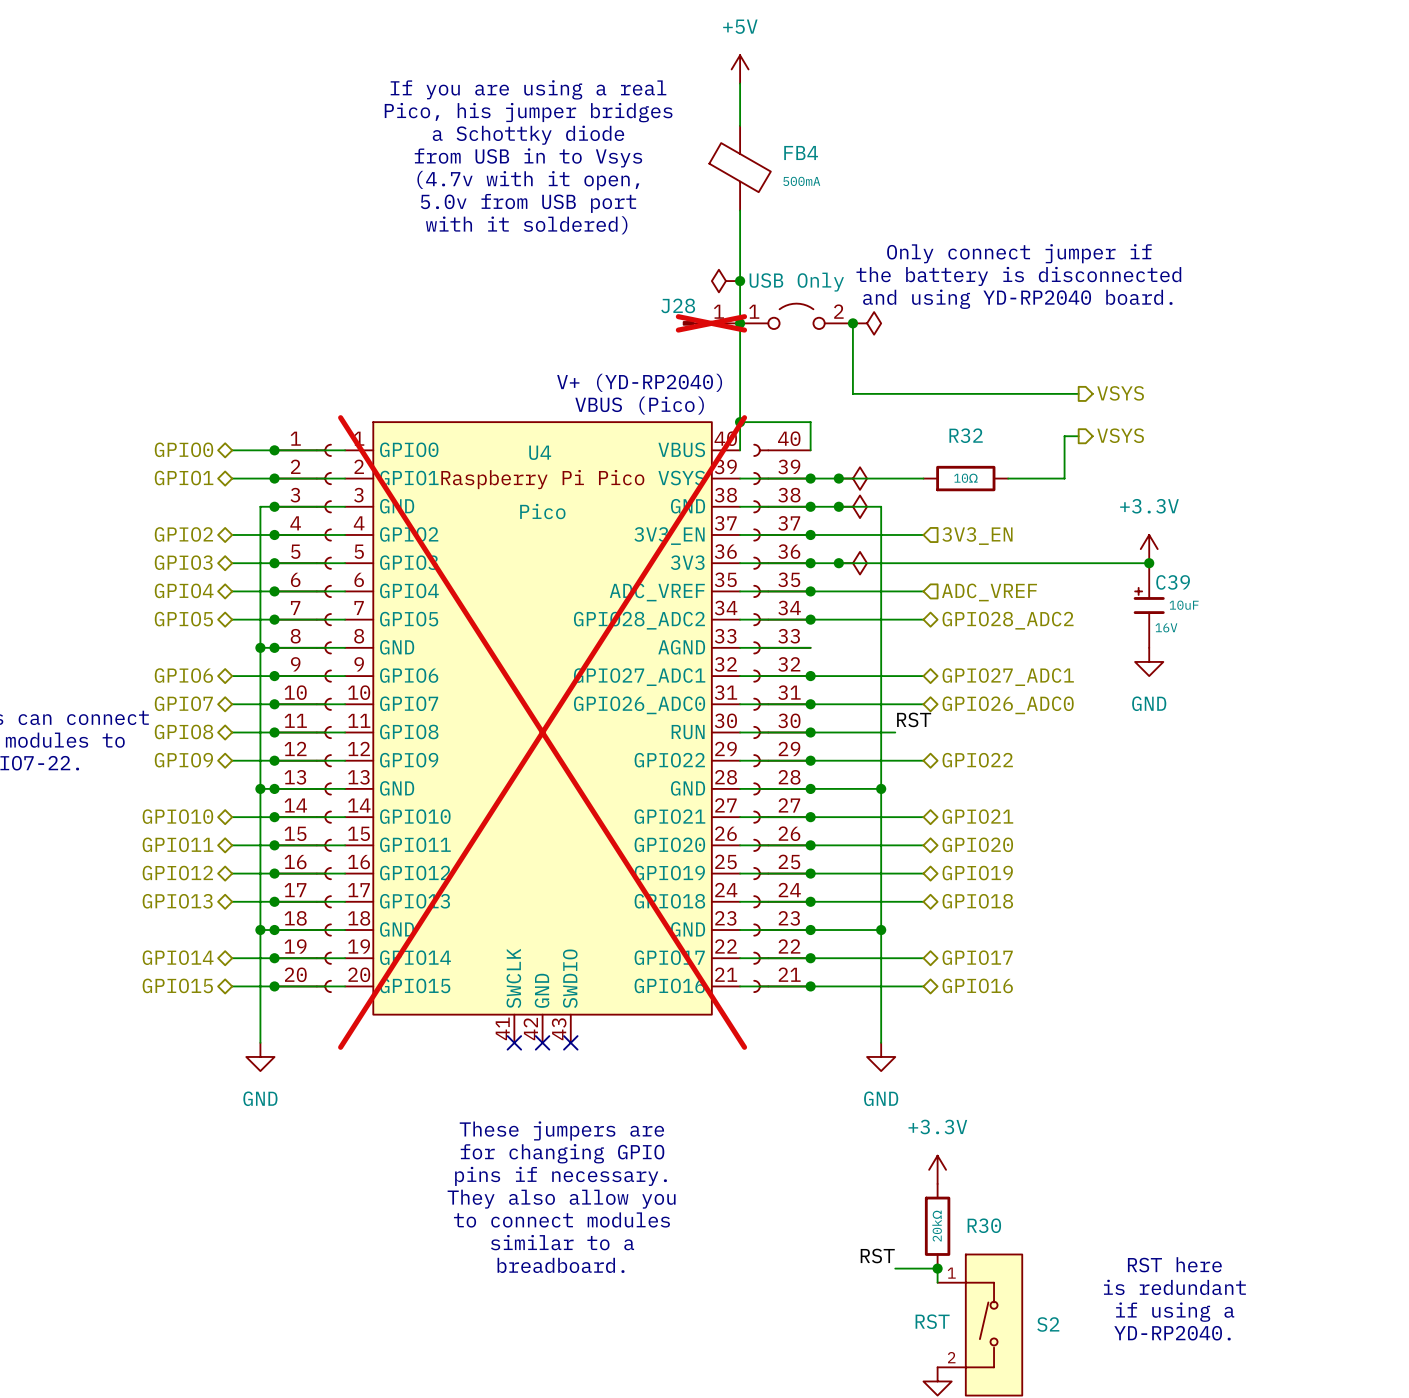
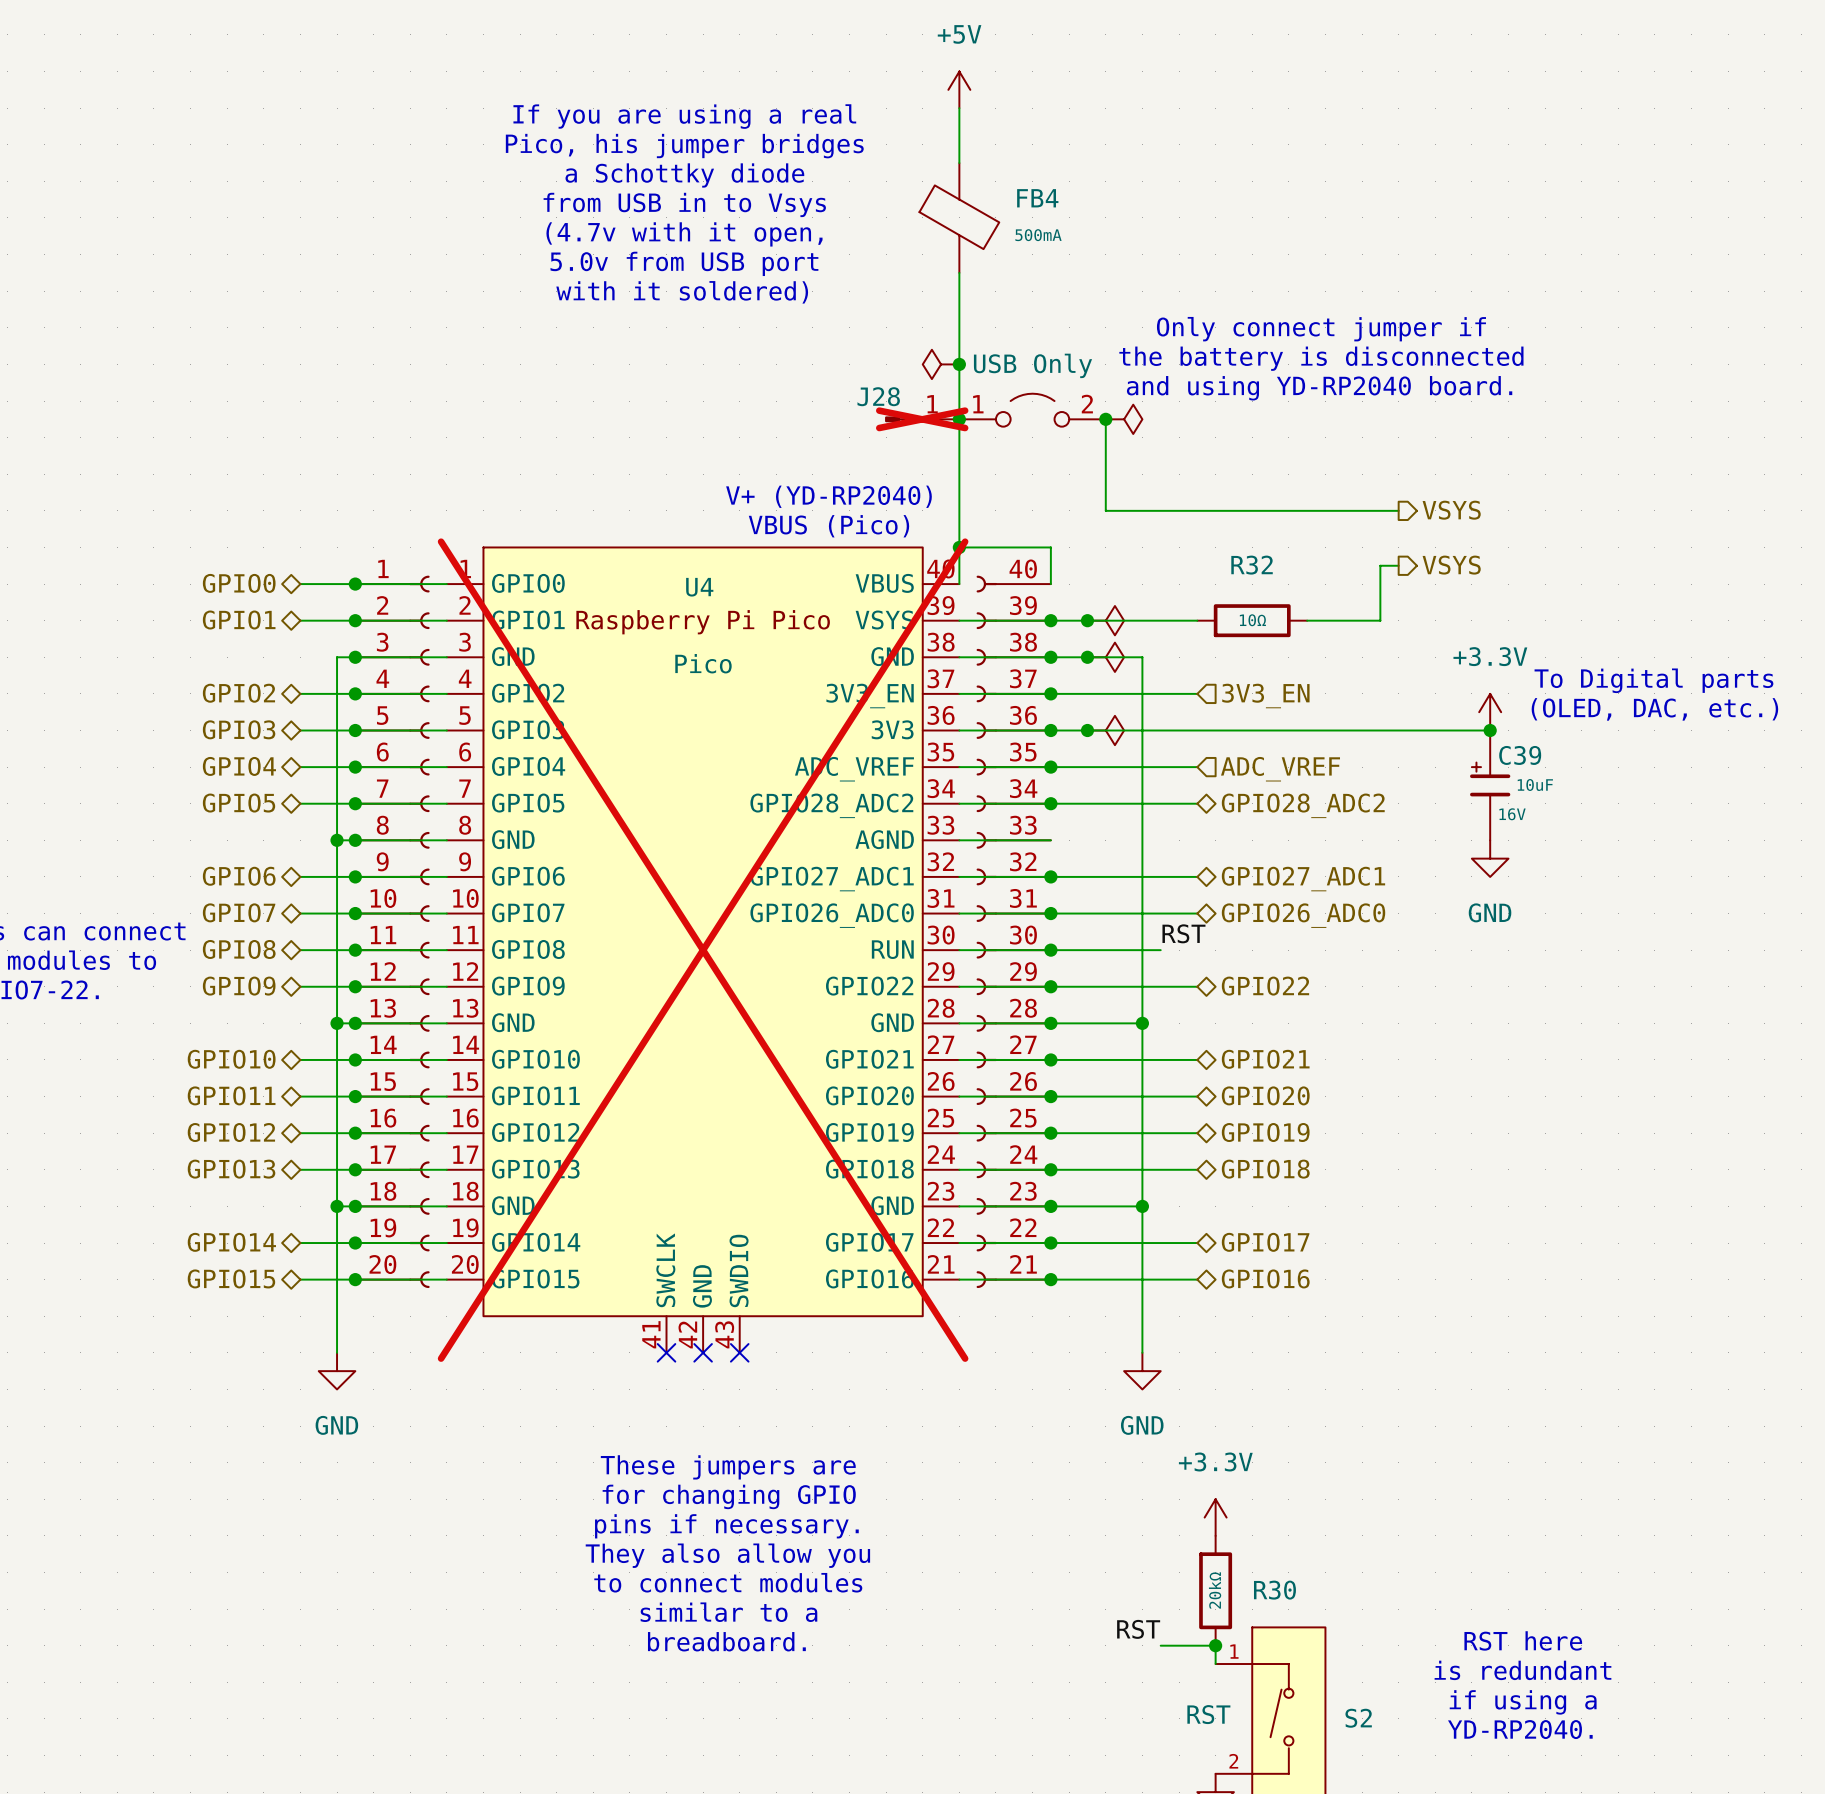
text: none -> To Digital parts (1653, 680)
text: none -> (OLED, DAC, etc.) (1654, 709)

